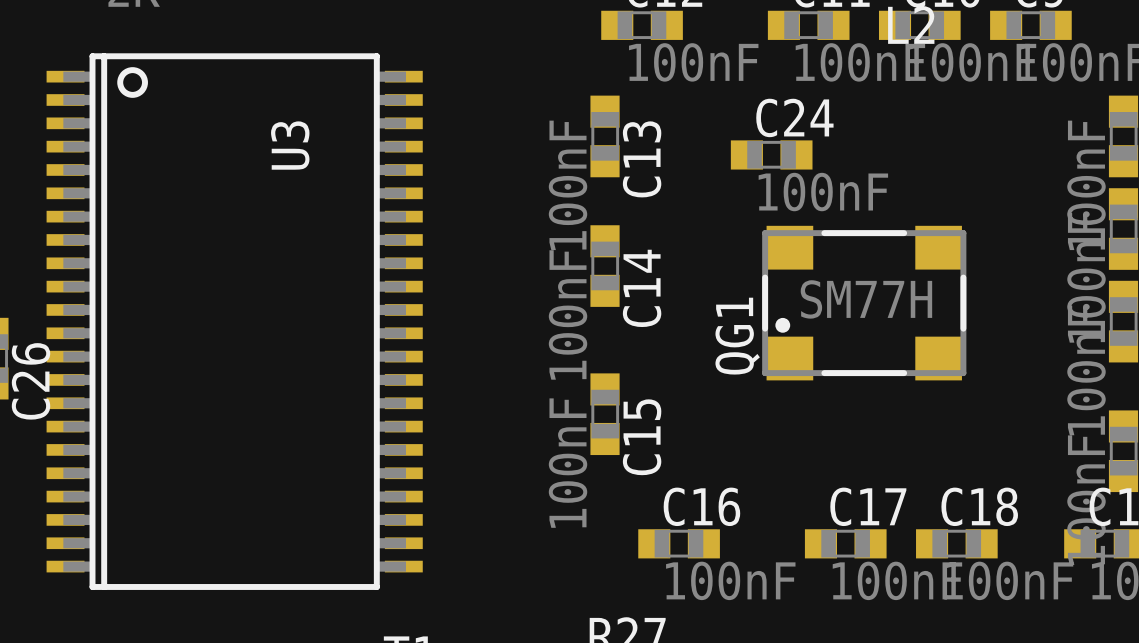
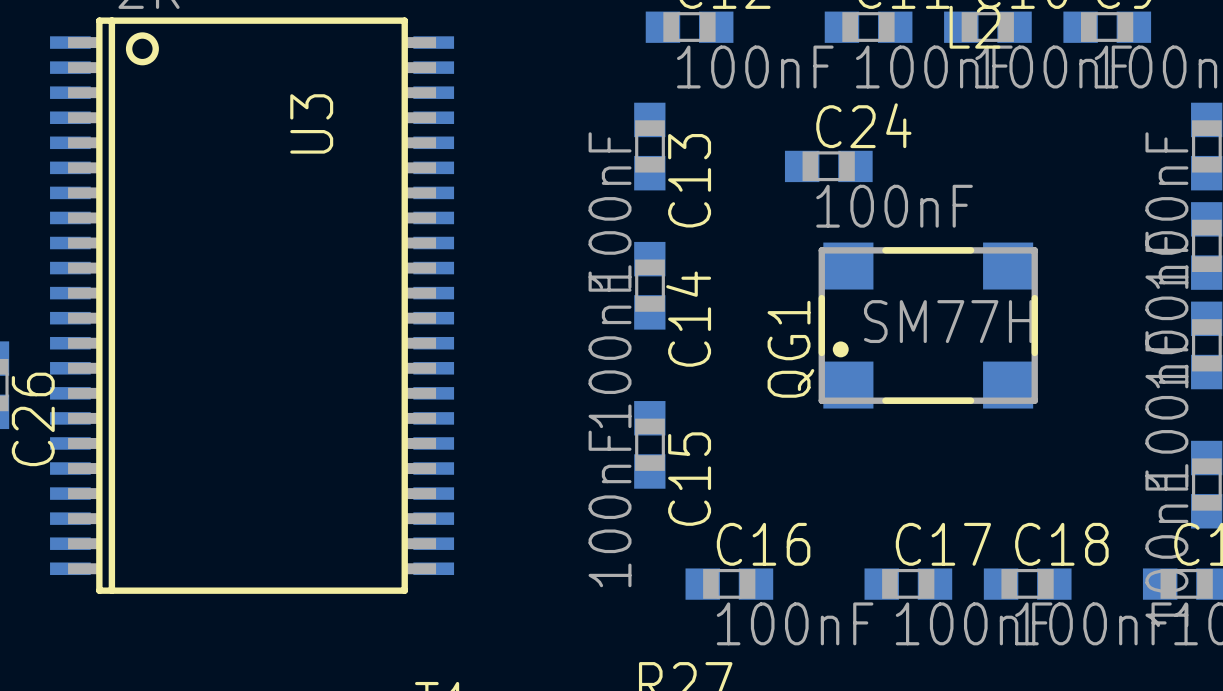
U3 position: (234, 321) -> (252, 305)

